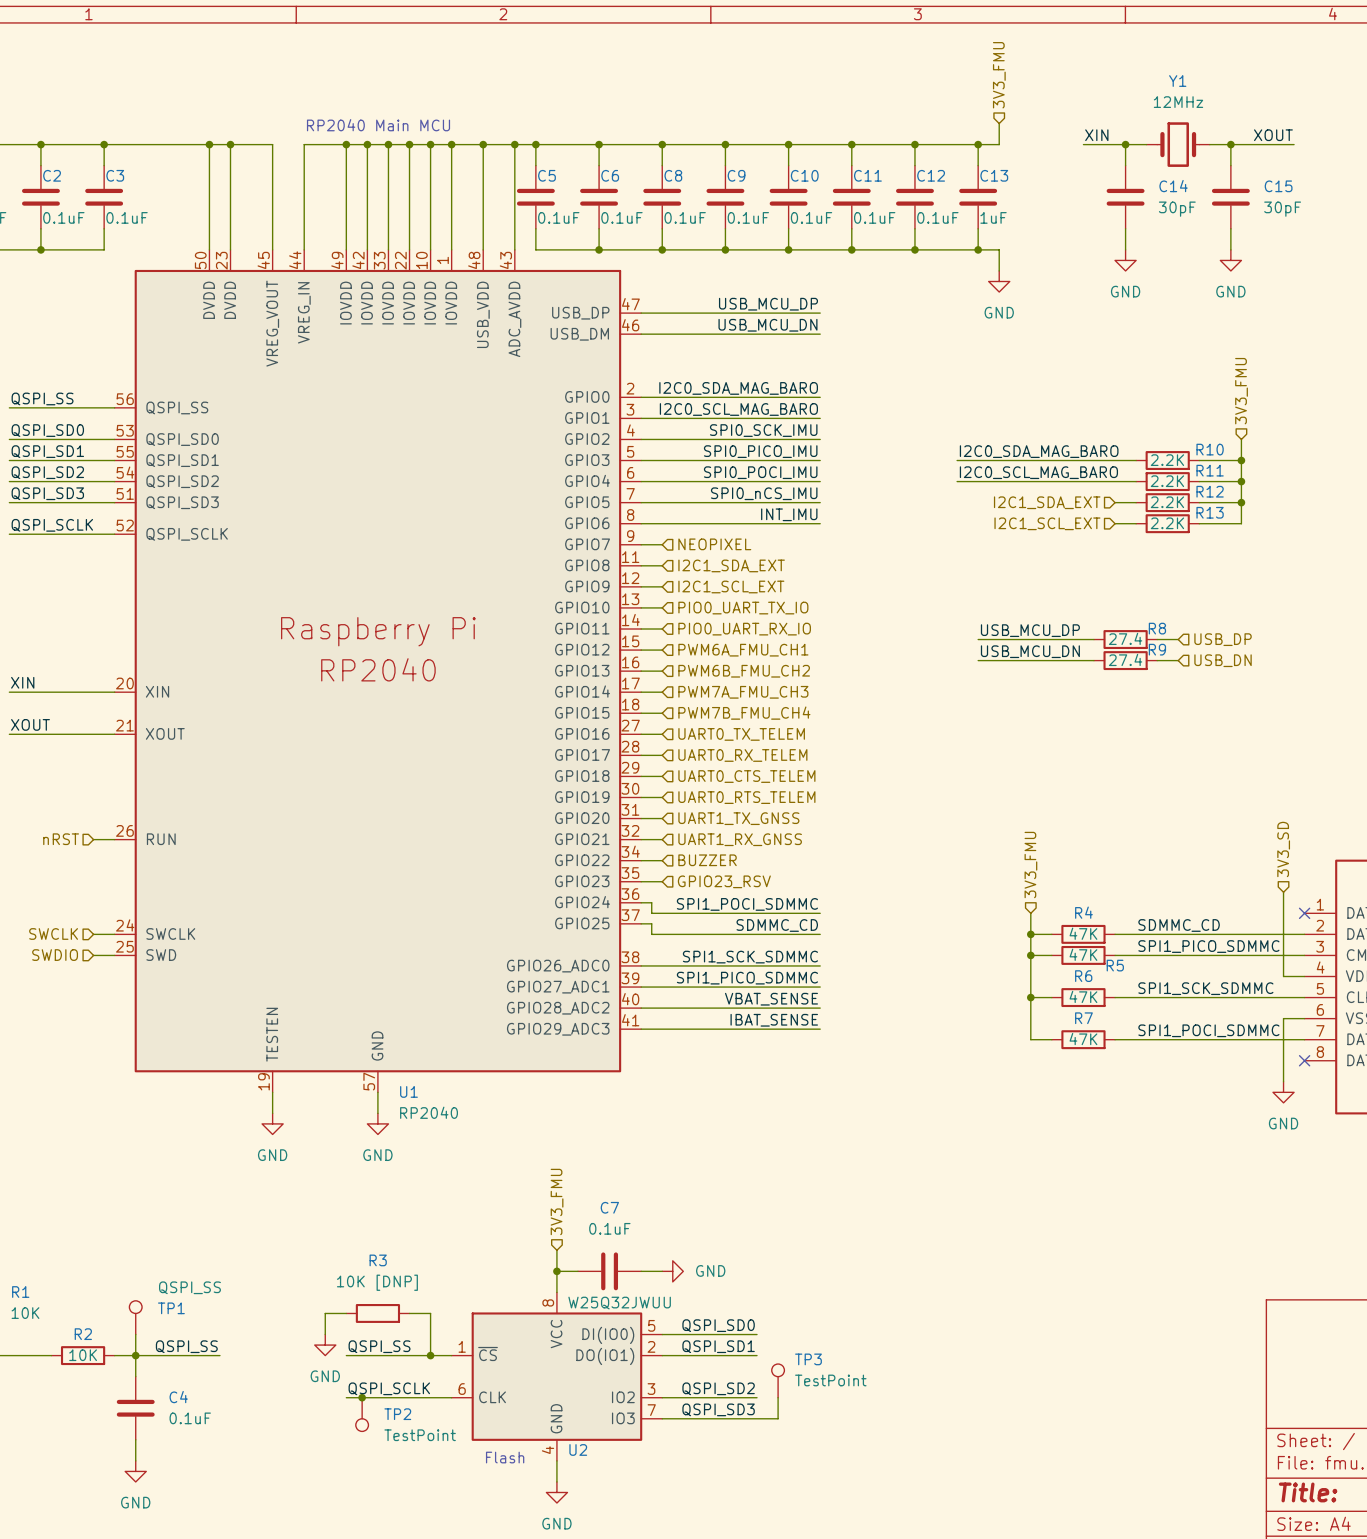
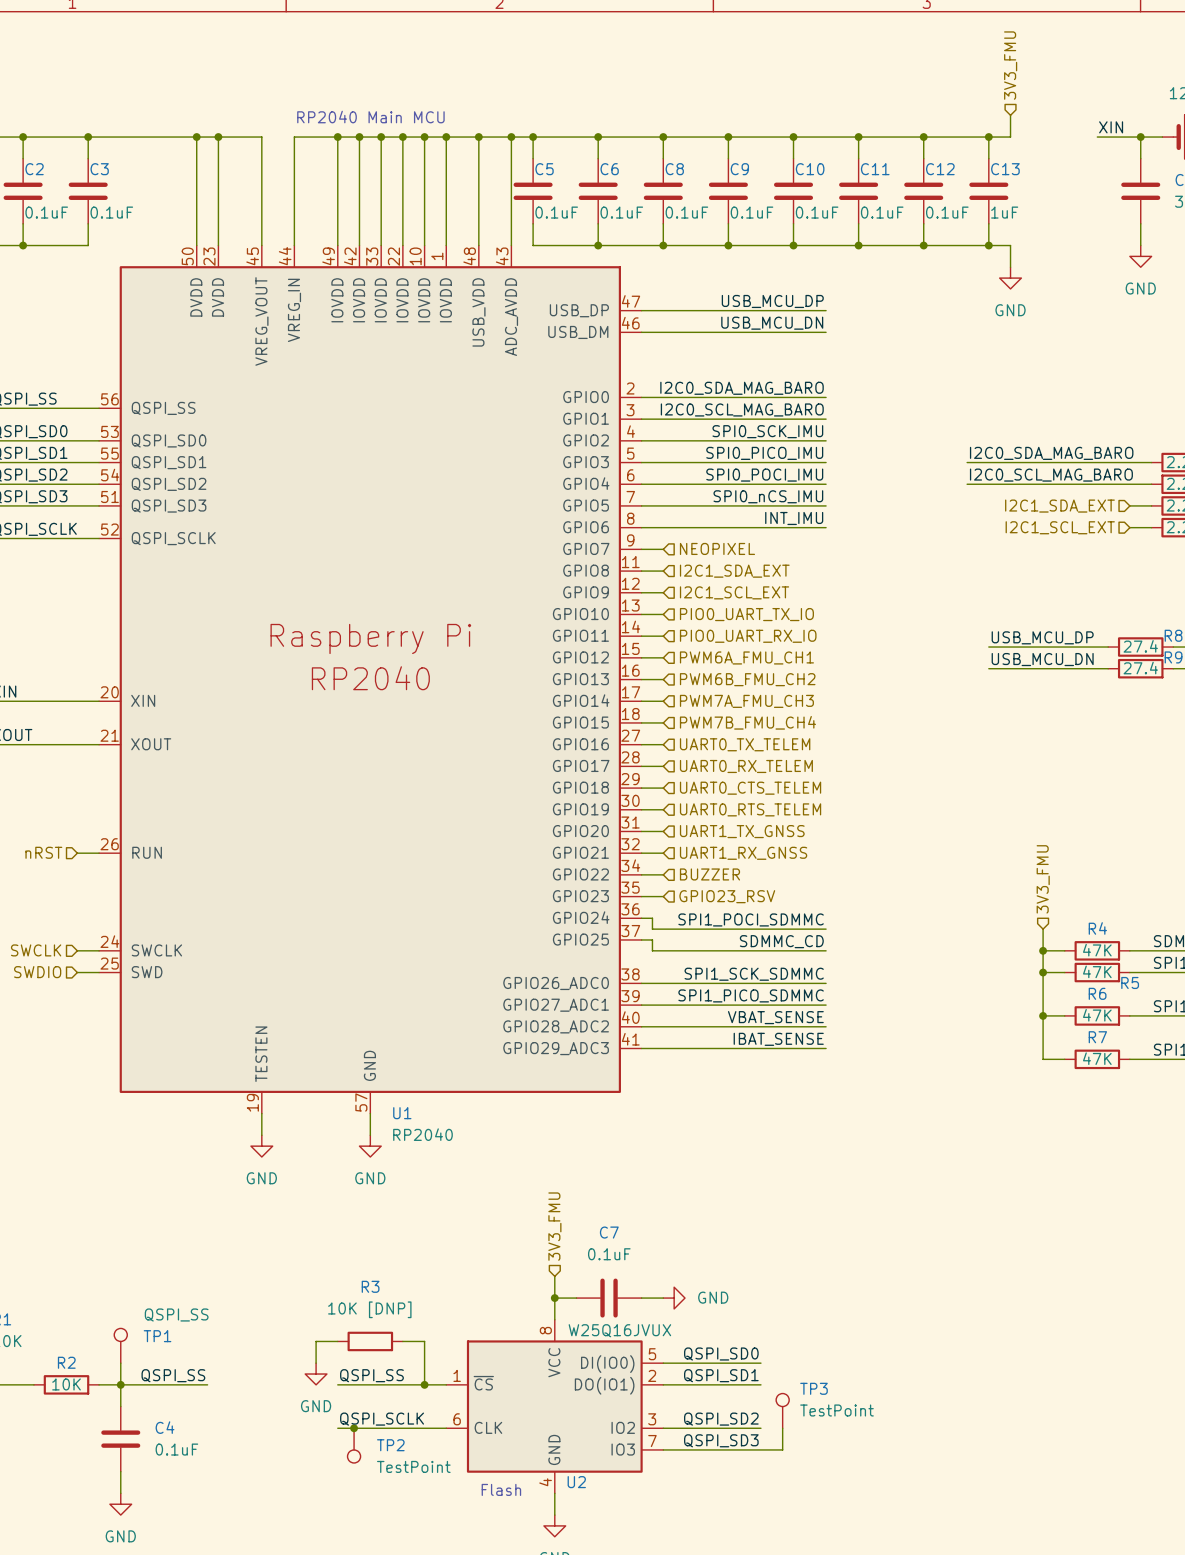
U2 value: W25Q32JWUU (619, 1303) -> W25Q16JVUX (619, 1330)

